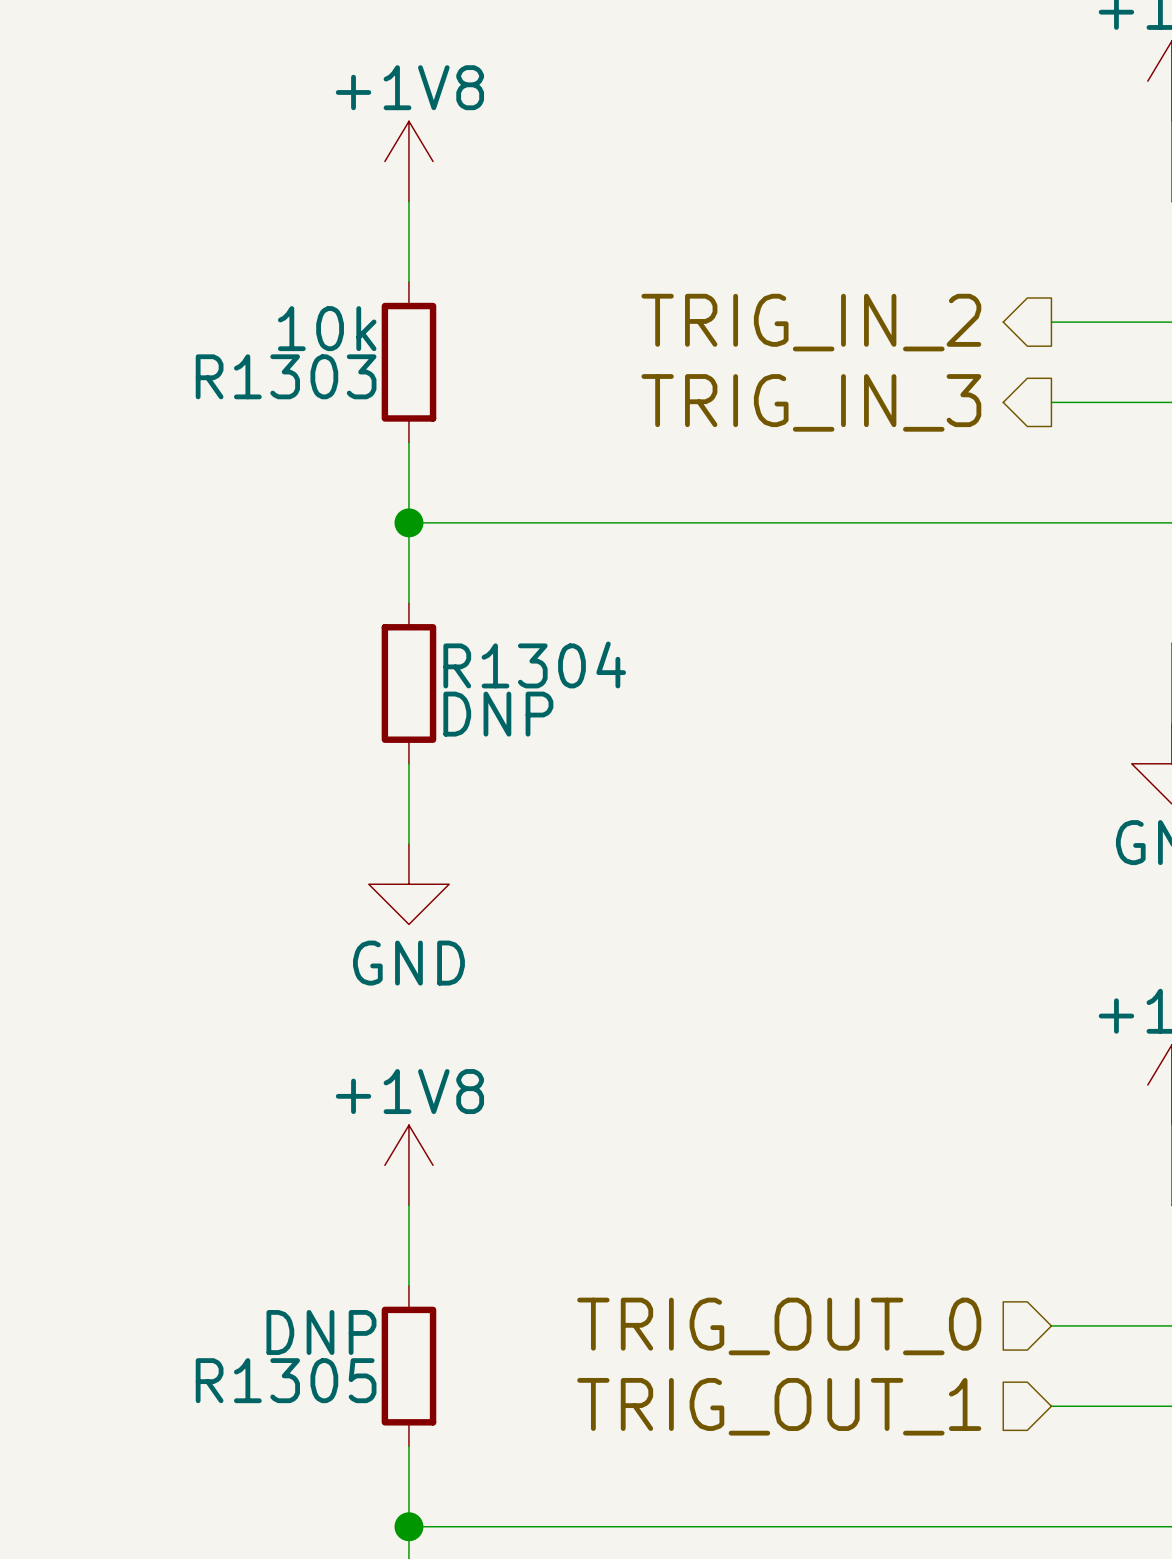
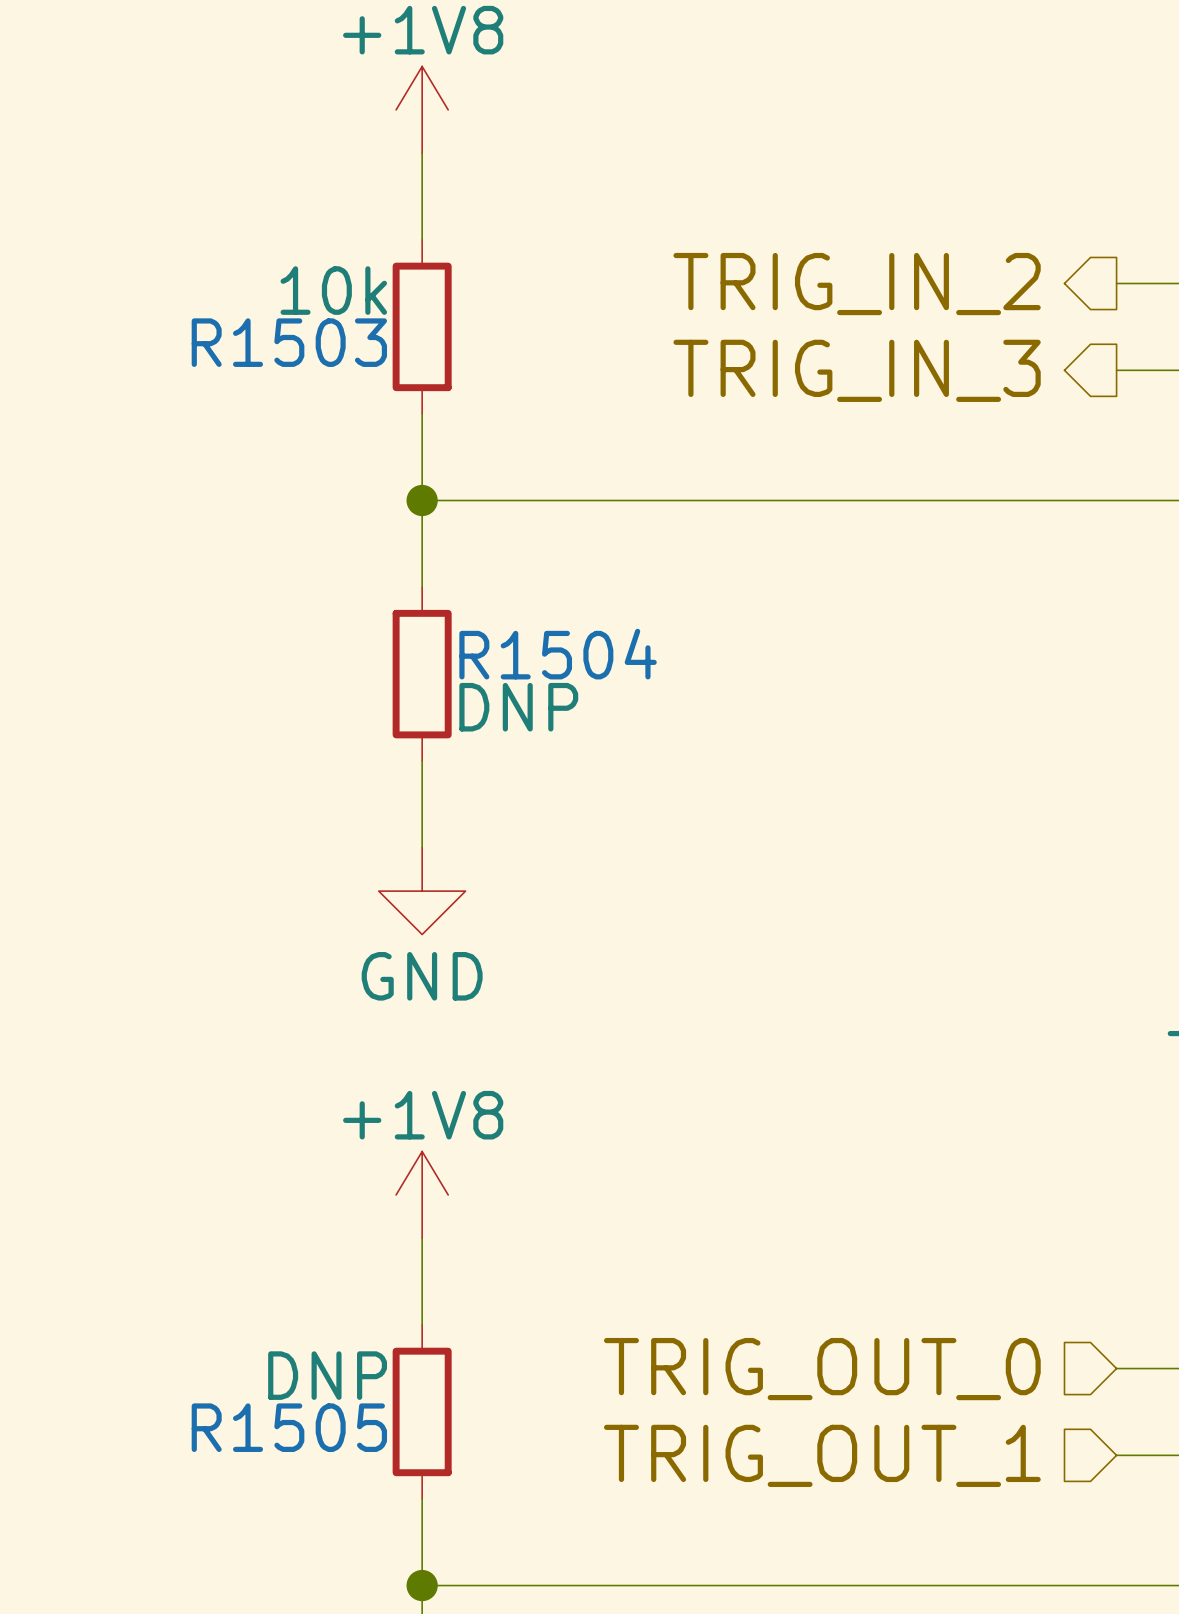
R1303 name: R1303 (286, 376) -> R1503 (289, 342)
R1304 name: R1304 (534, 664) -> R1504 (558, 654)
R1305 name: R1305 (286, 1380) -> R1505 (289, 1427)

